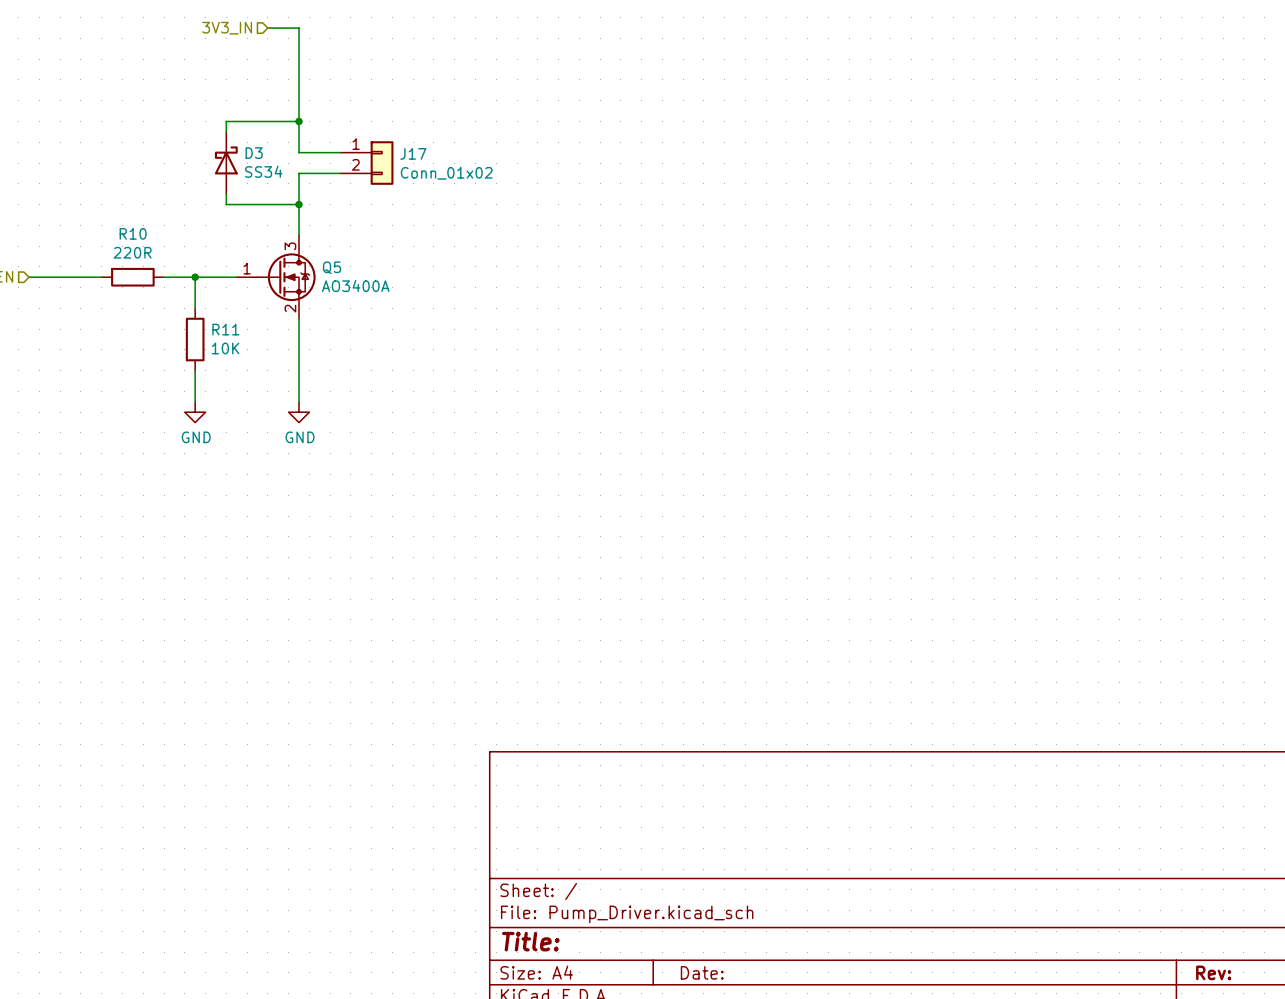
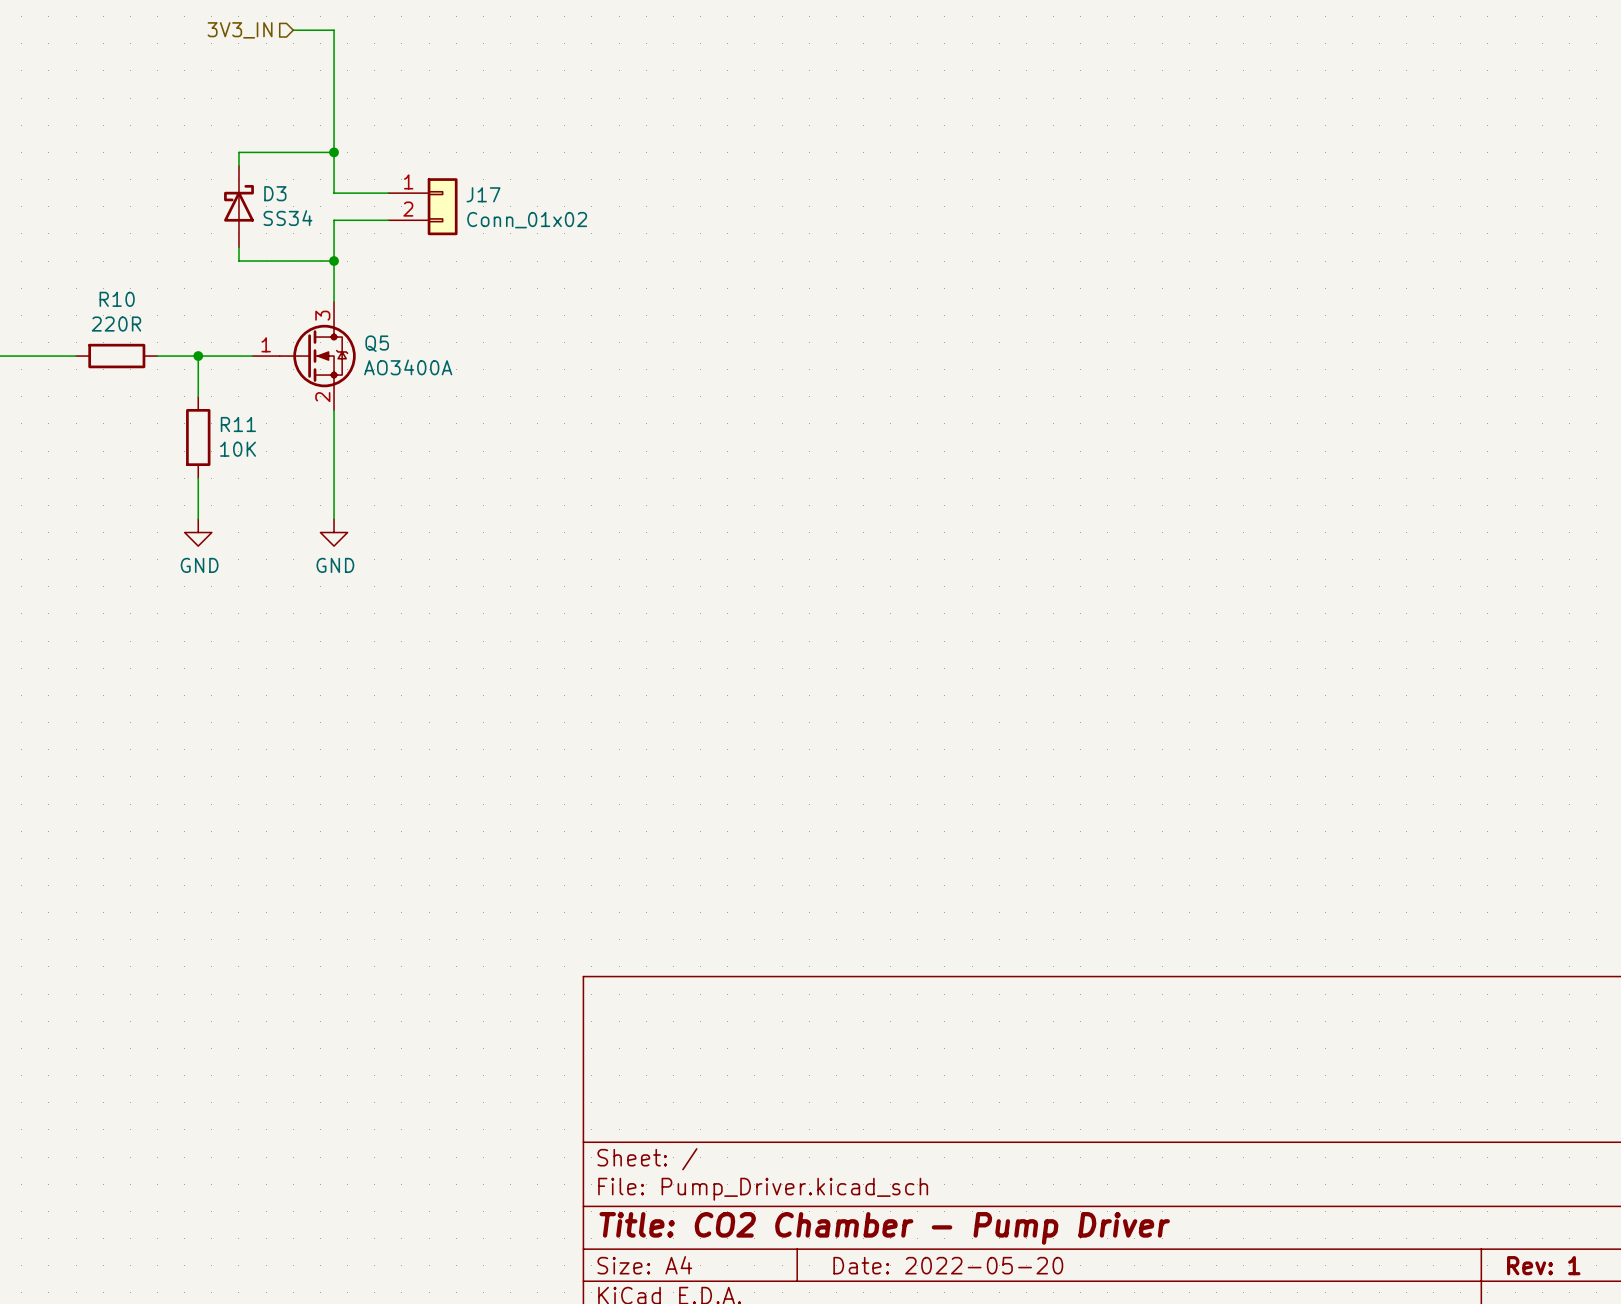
title block: Title: (530, 941) -> Title: CO2 Chamber - Pump Driver (884, 1228)
title block: Date: (702, 972) -> Date: 2022-05-20 (948, 1265)
title block: Rev: (1213, 972) -> Rev: 1 (1543, 1265)

